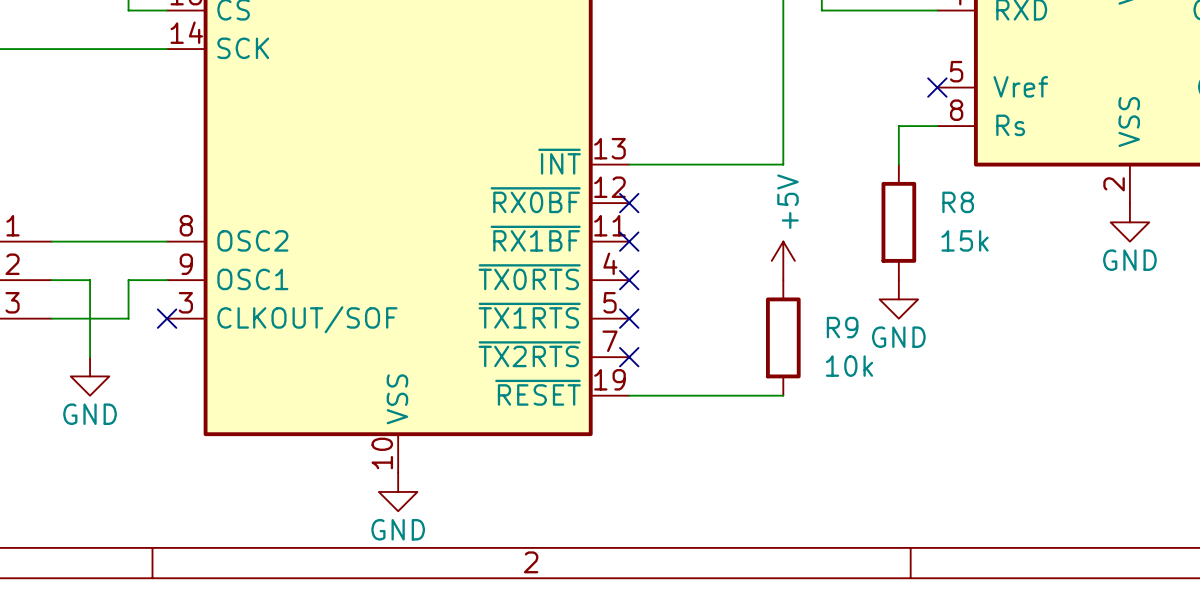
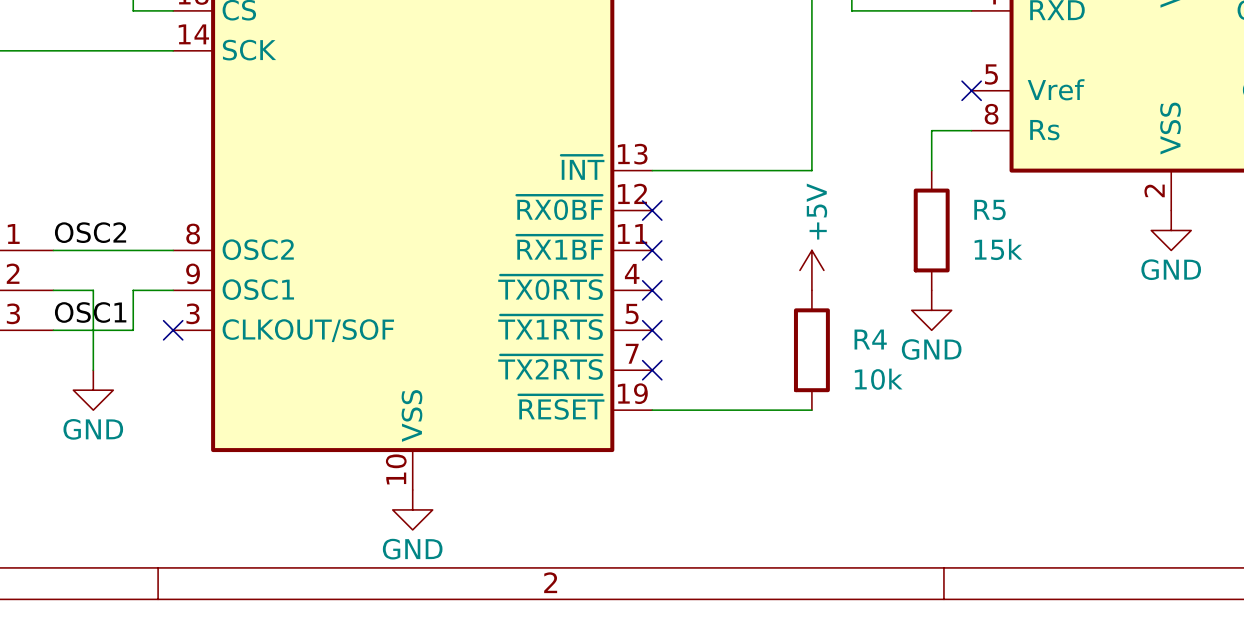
R8 name: R8 (958, 202) -> R5 (989, 209)
label: none -> OSC2 (90, 232)
label: none -> OSC1 (90, 312)
R9 name: R9 (842, 327) -> R4 (870, 339)

